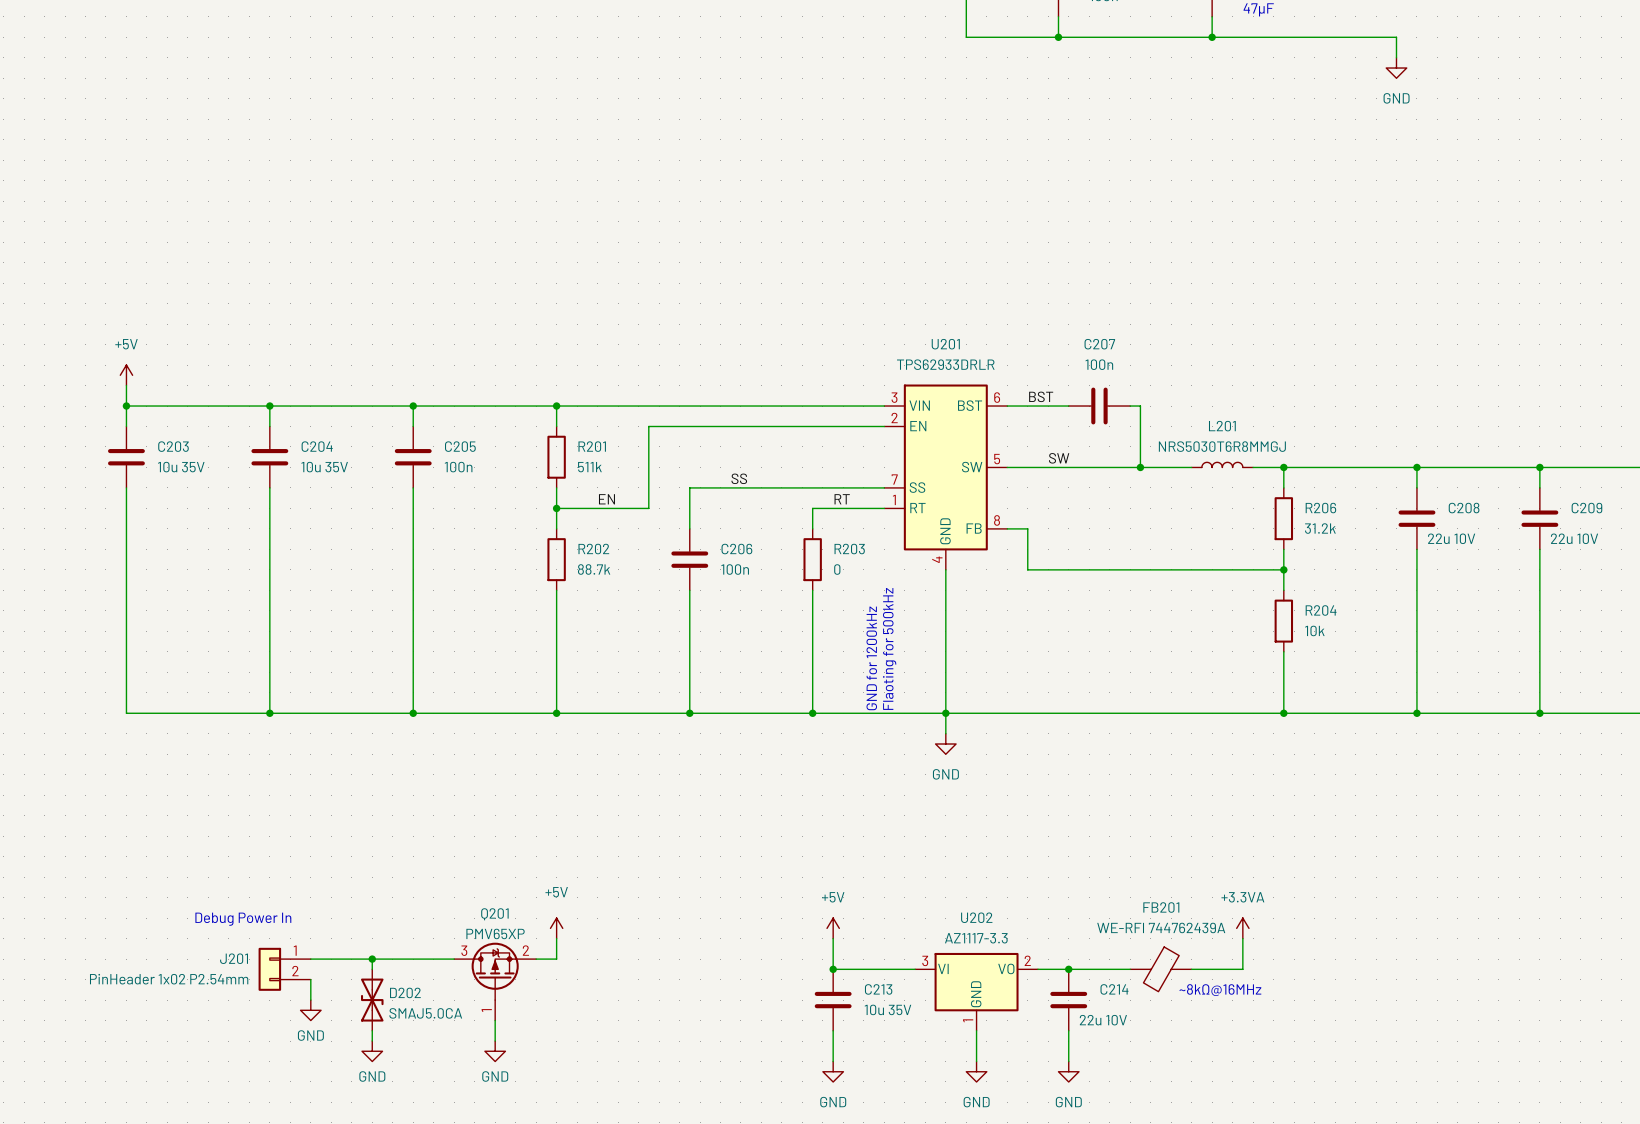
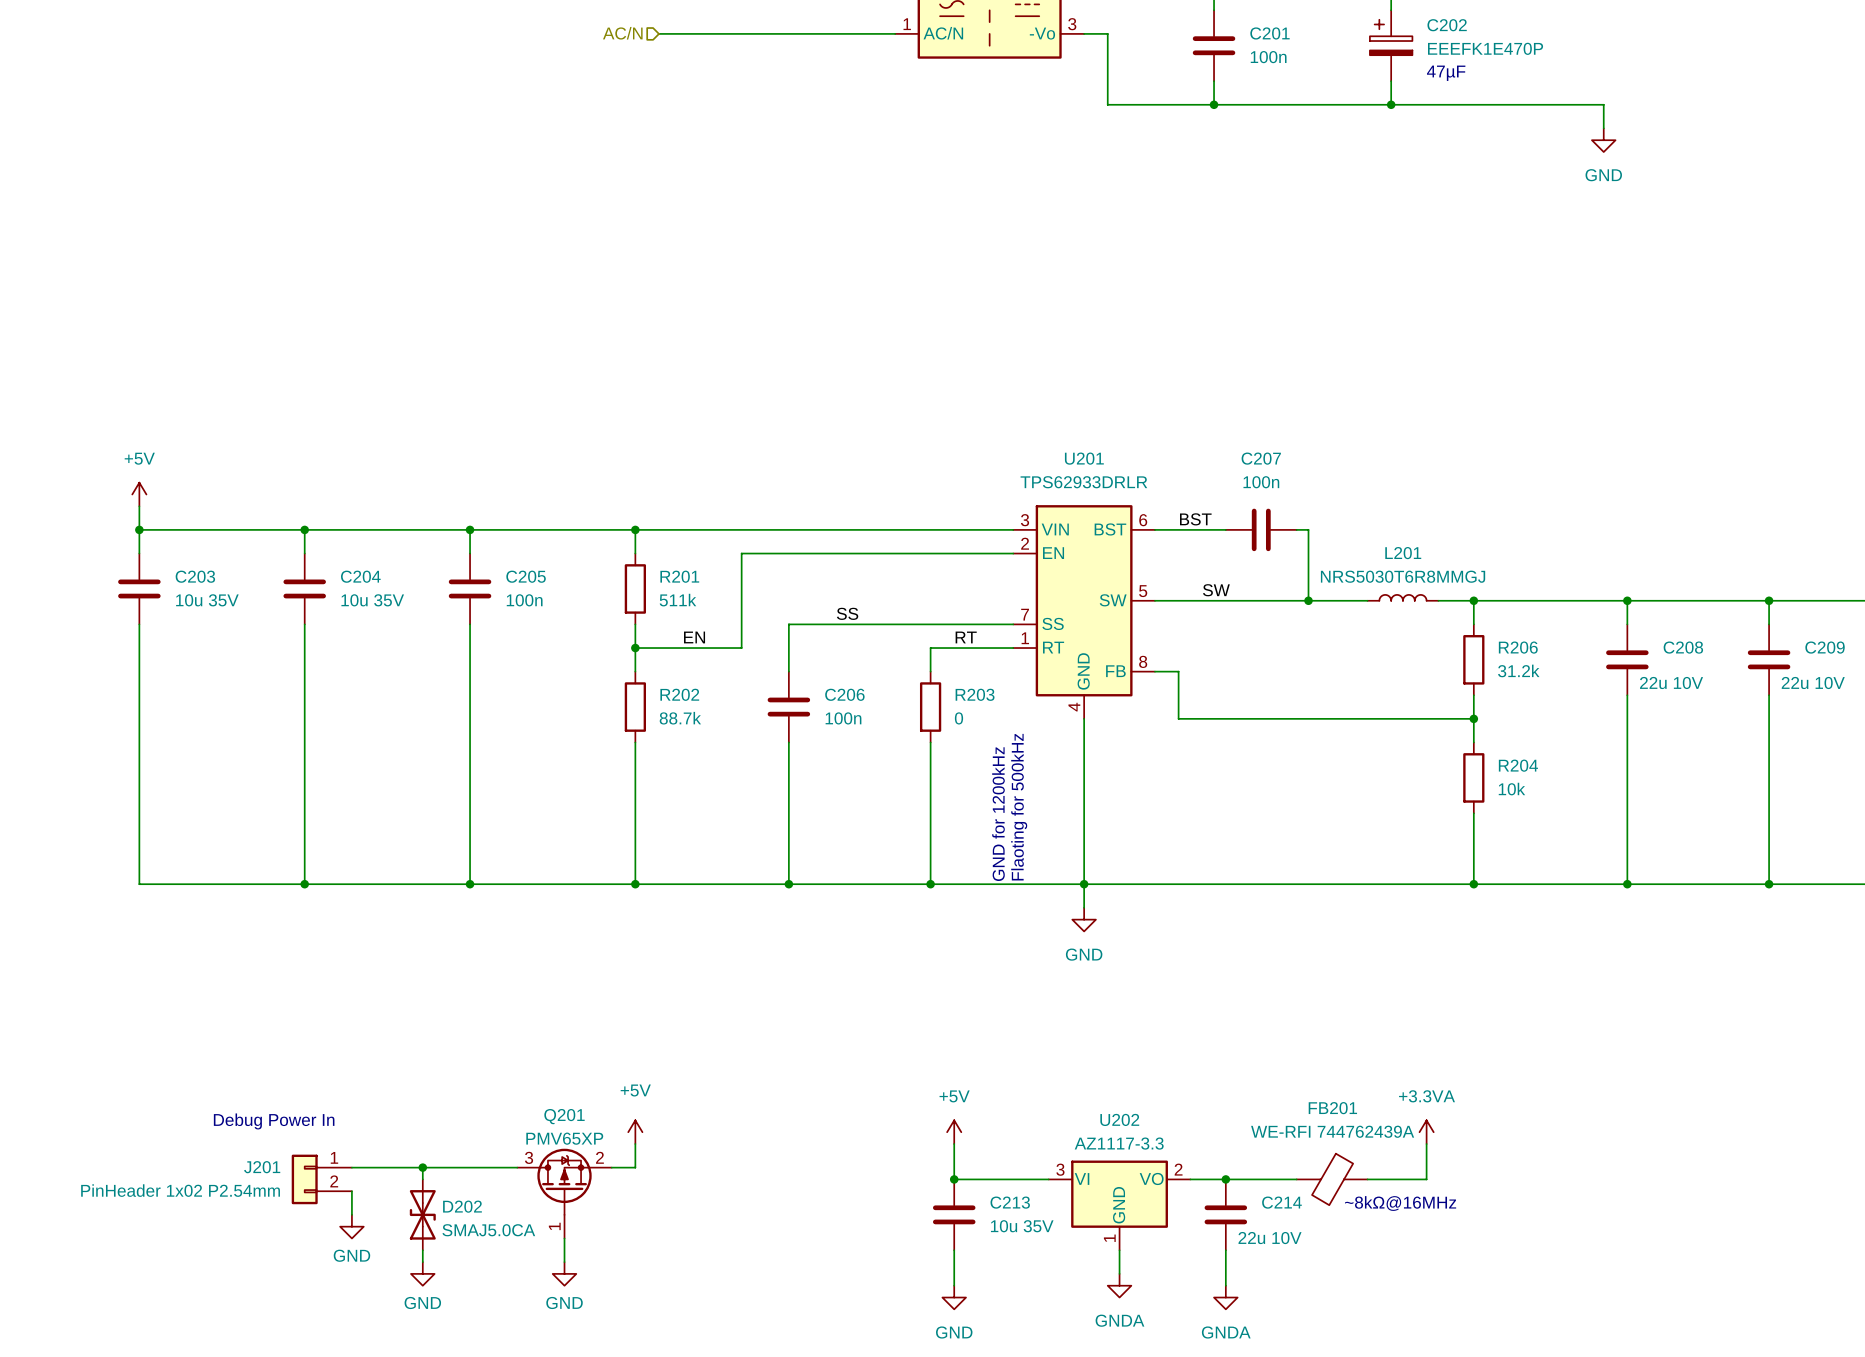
power symbol: none -> GNDA (1119, 1285)
power symbol: GND (976, 1071) -> none
power symbol: GND (1068, 1071) -> GNDA (1225, 1297)

